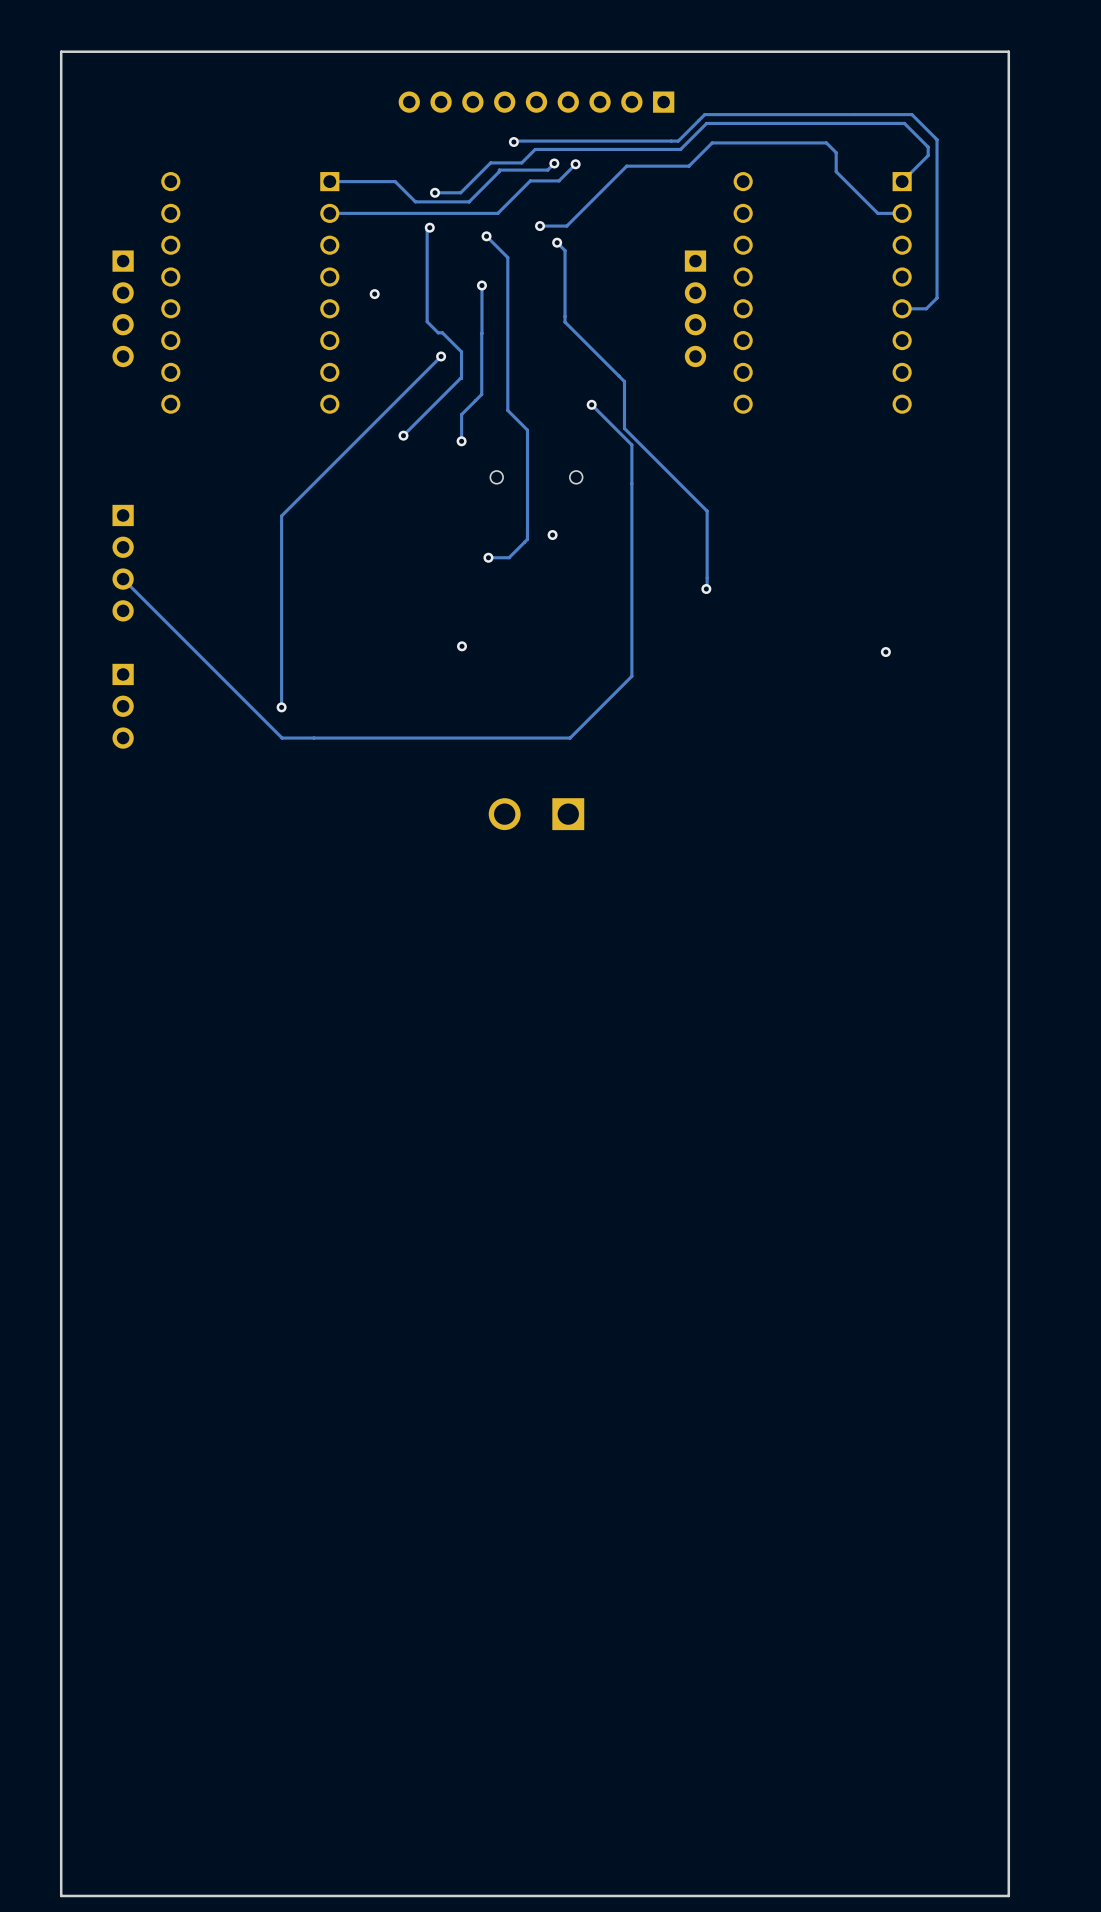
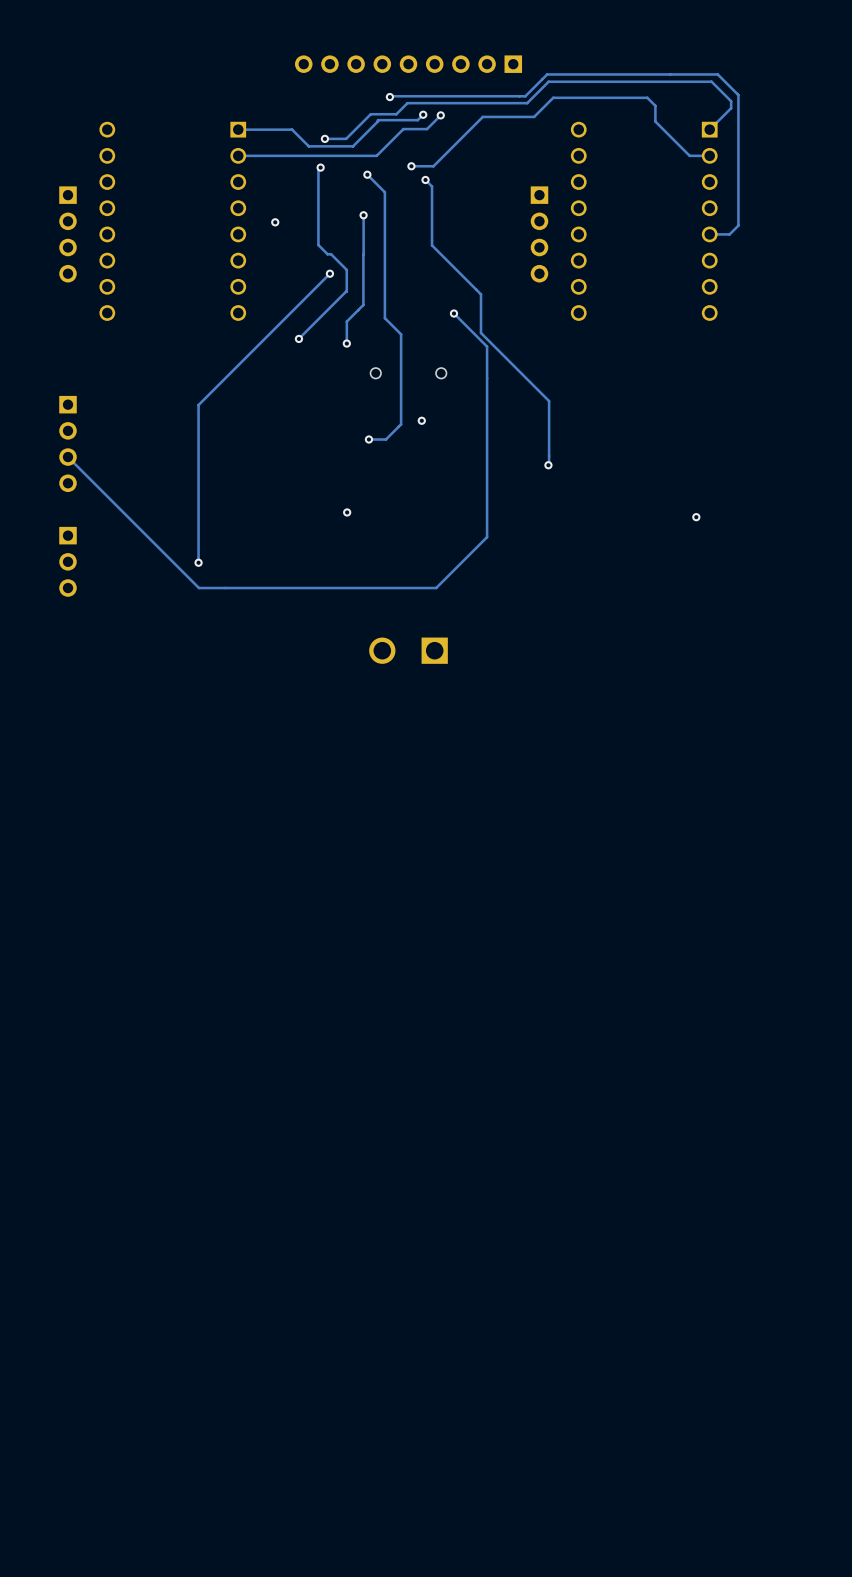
board edge: (1008, 51) (61, 51) (61, 1895) (1008, 1895) (1008, 51) -> none

